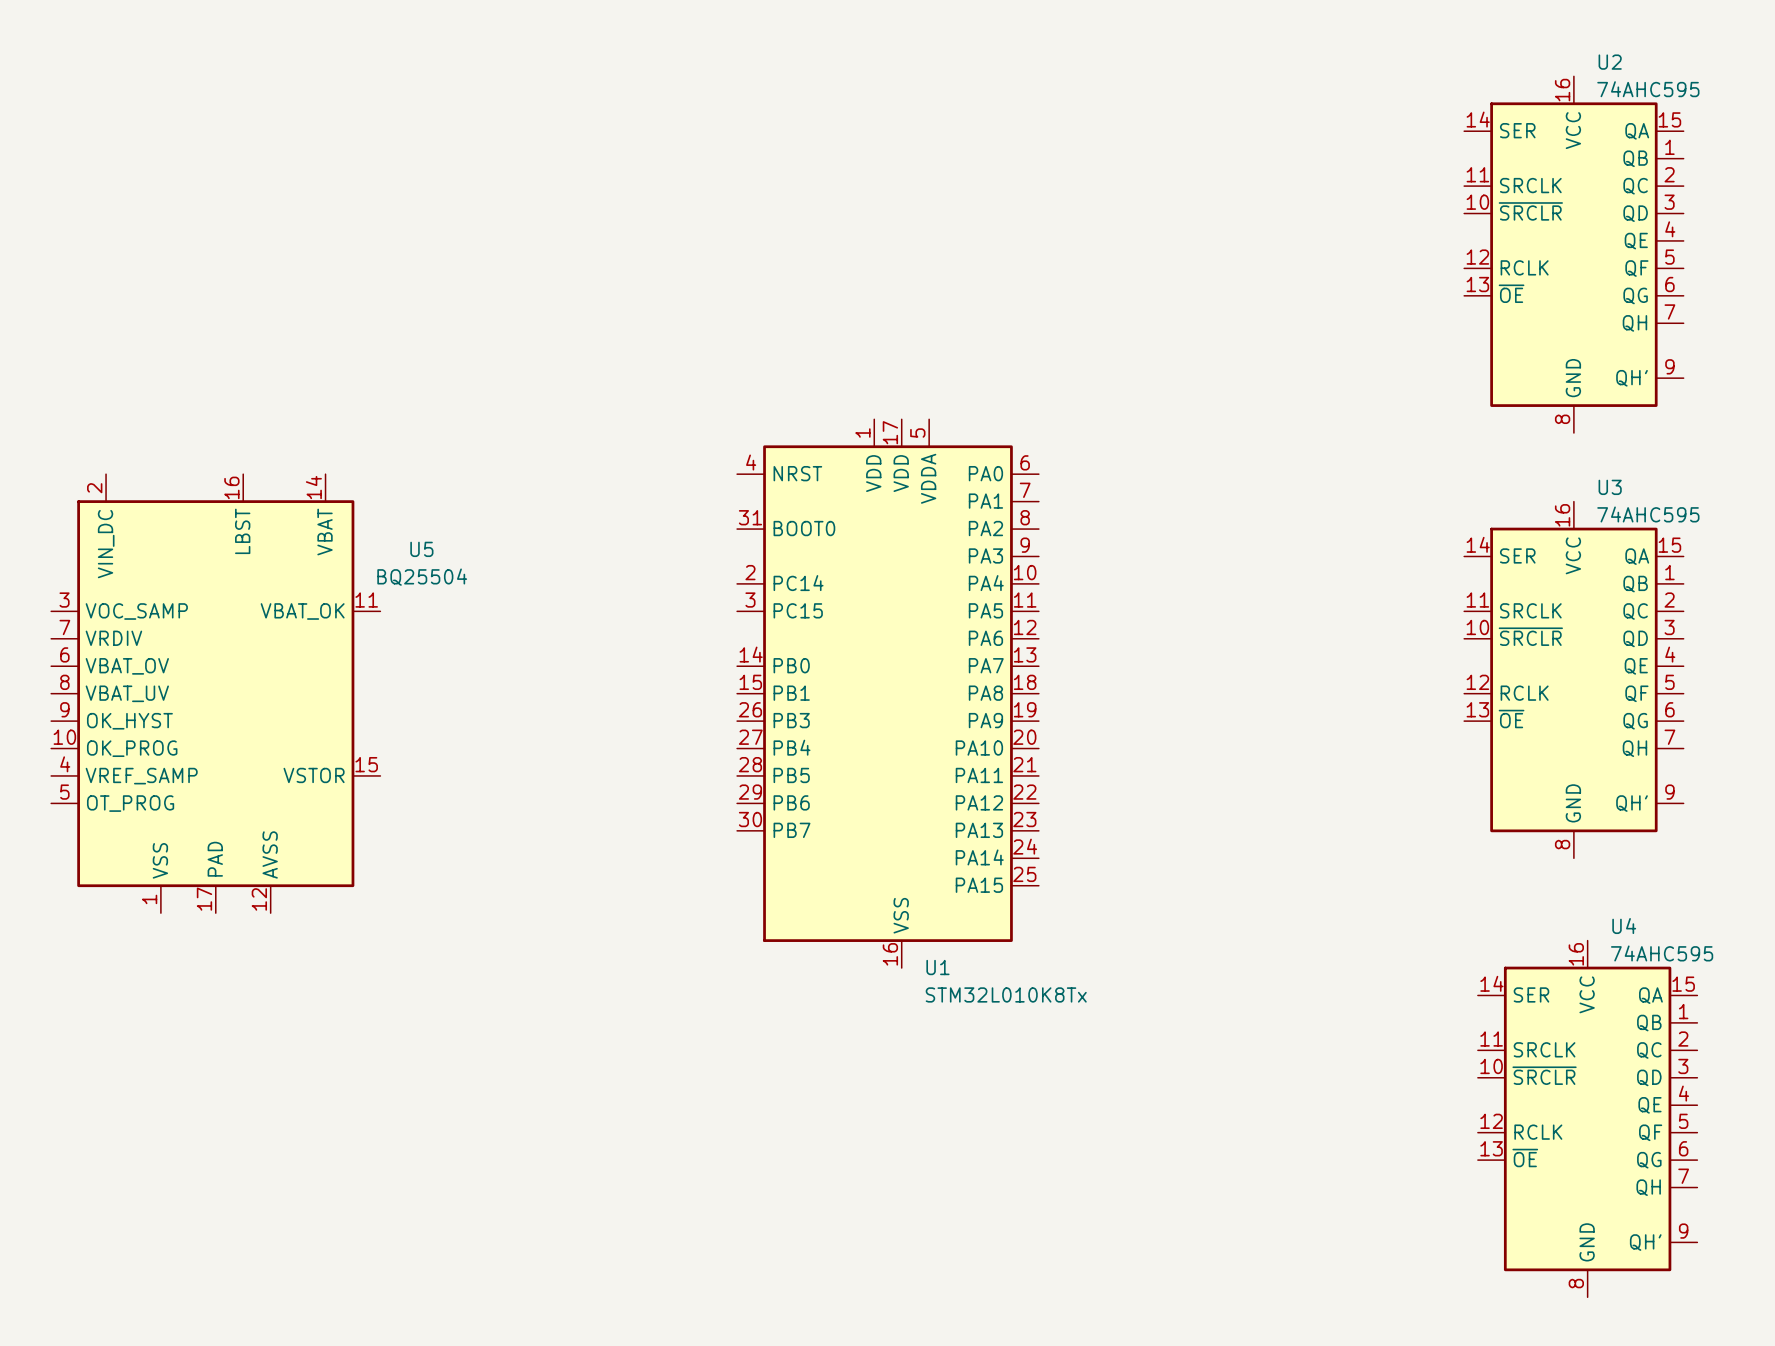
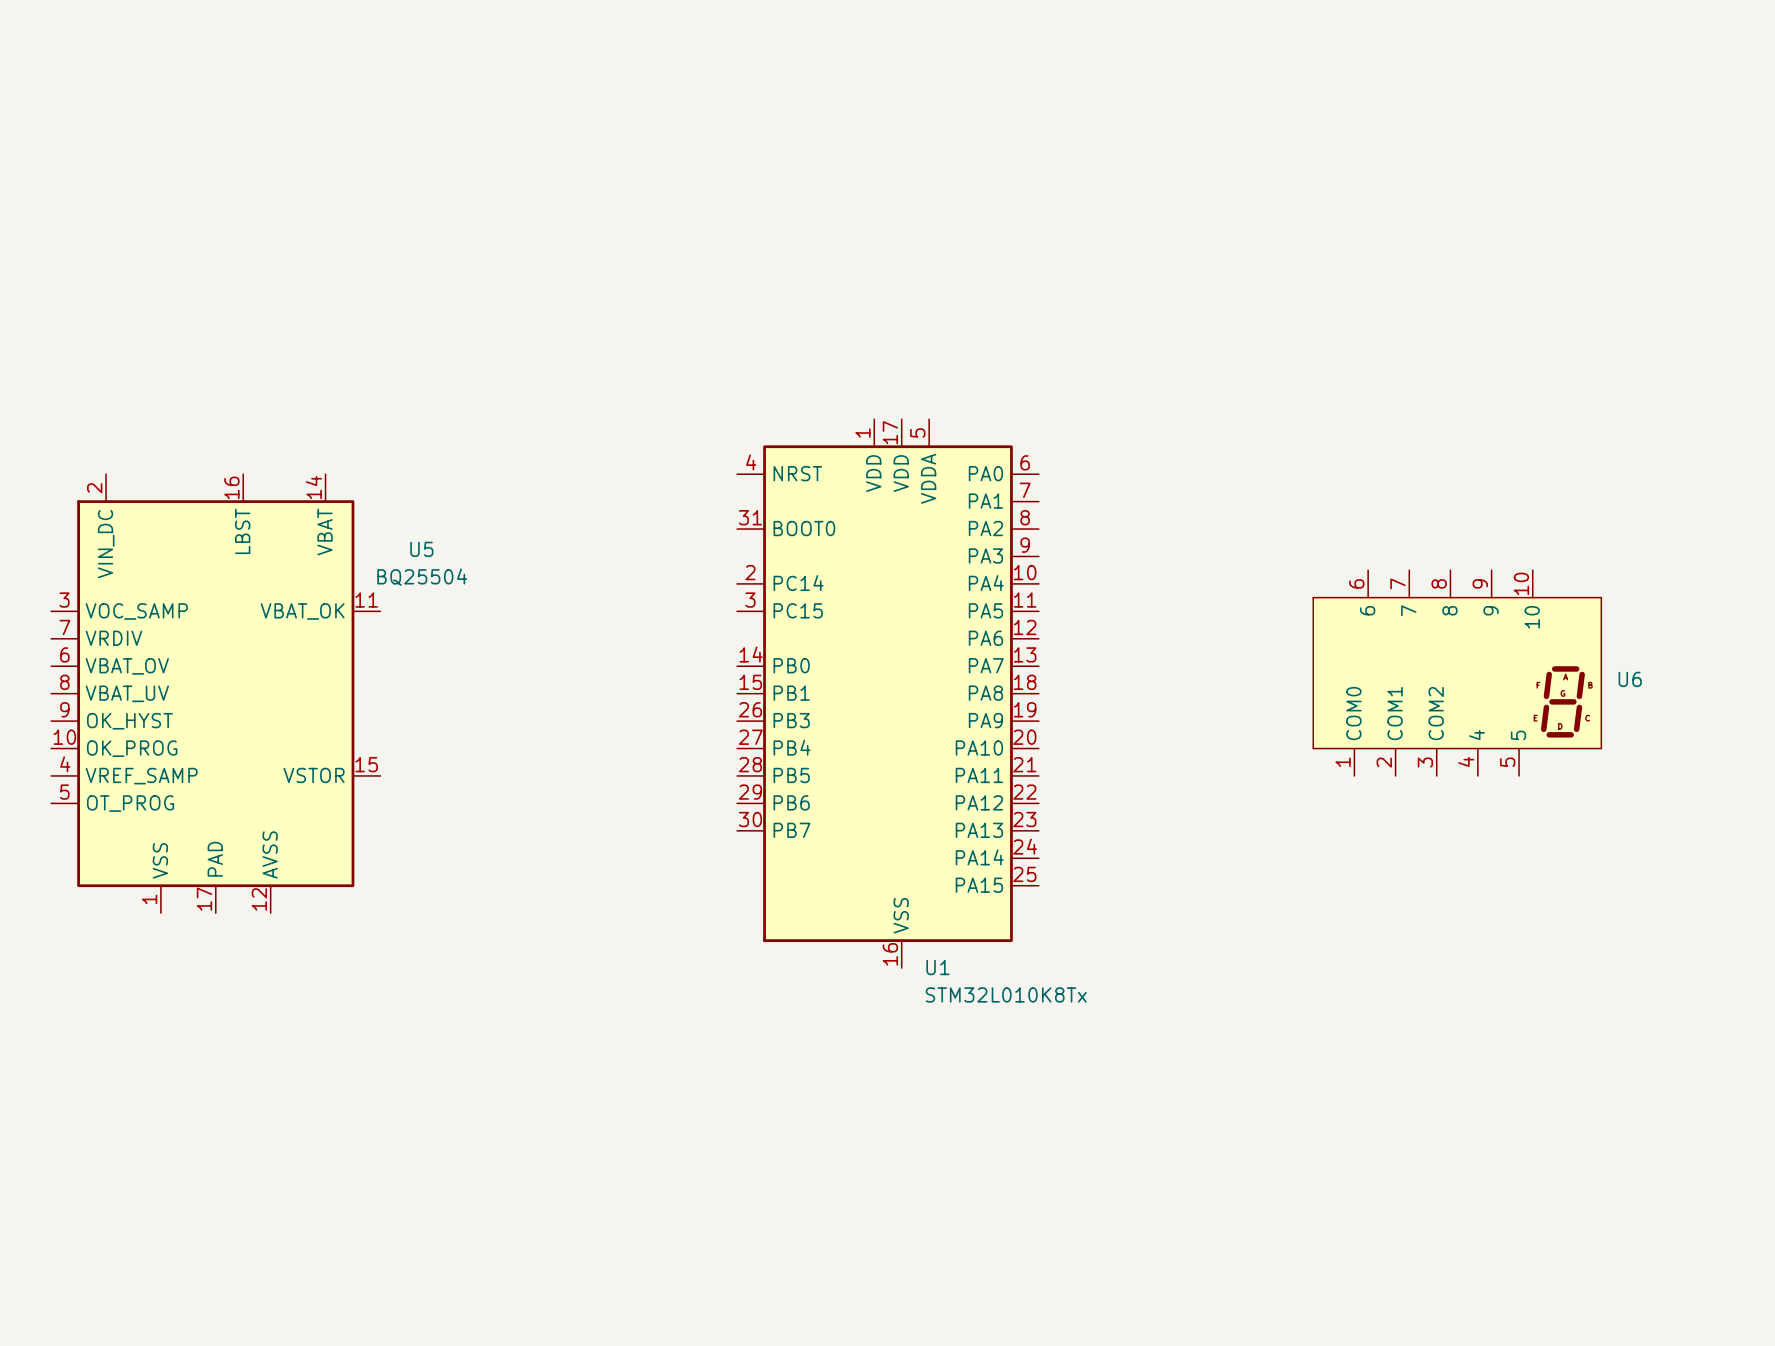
U2: 74AHC595 (1573, 254) -> none
U6: none -> (1457, 673)
U3: 74AHC595 (1573, 679) -> none
U4: 74AHC595 (1587, 1118) -> none

